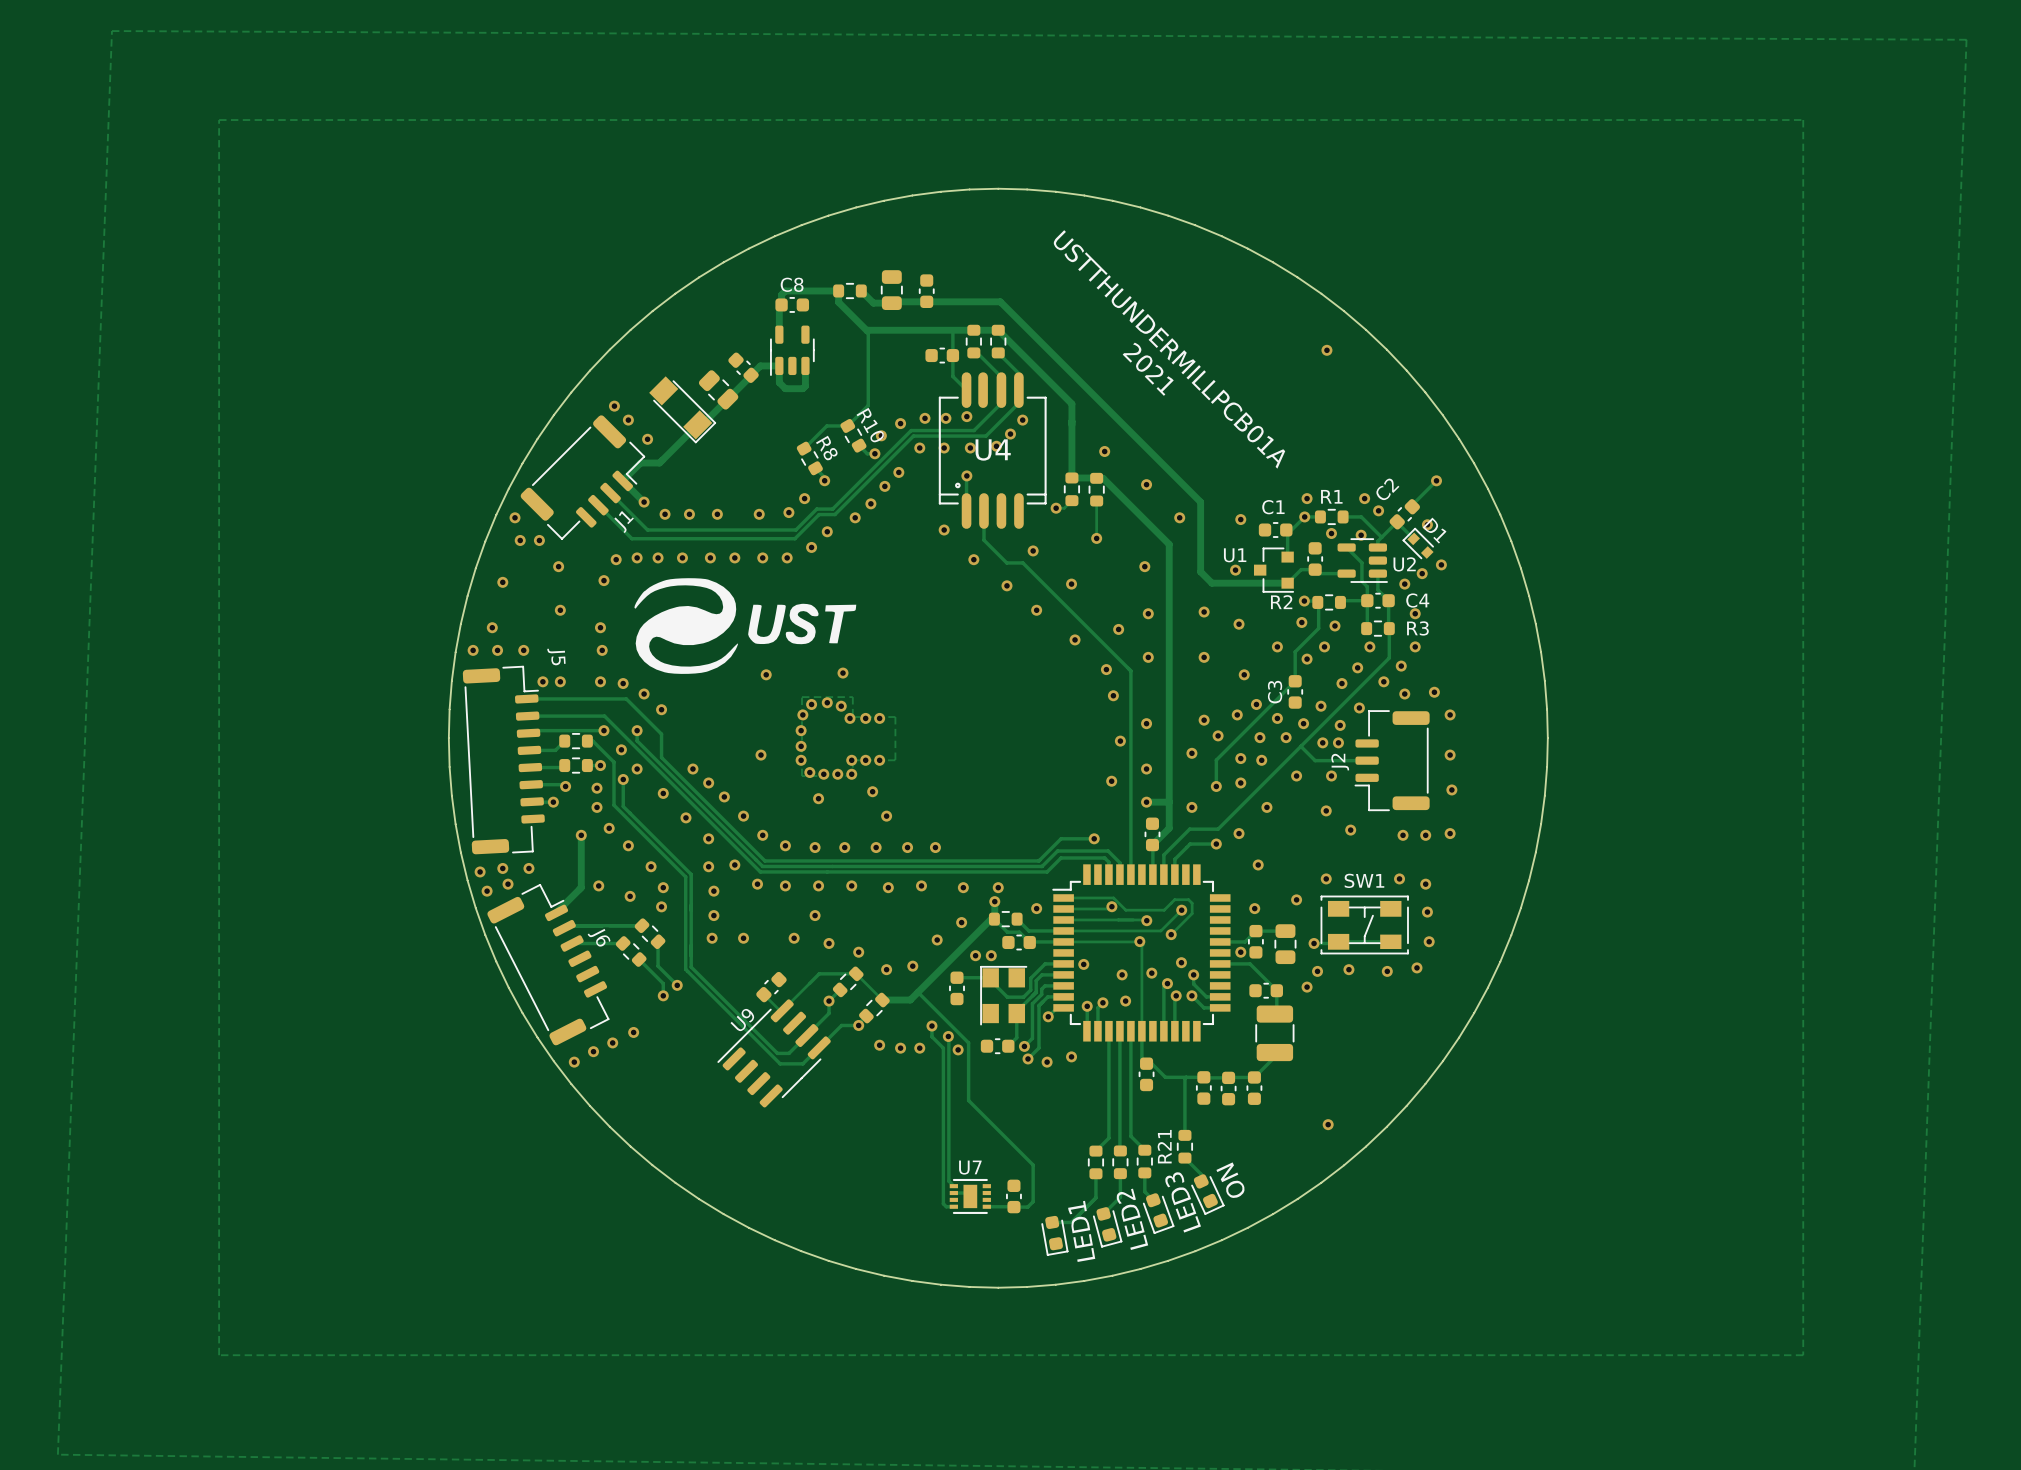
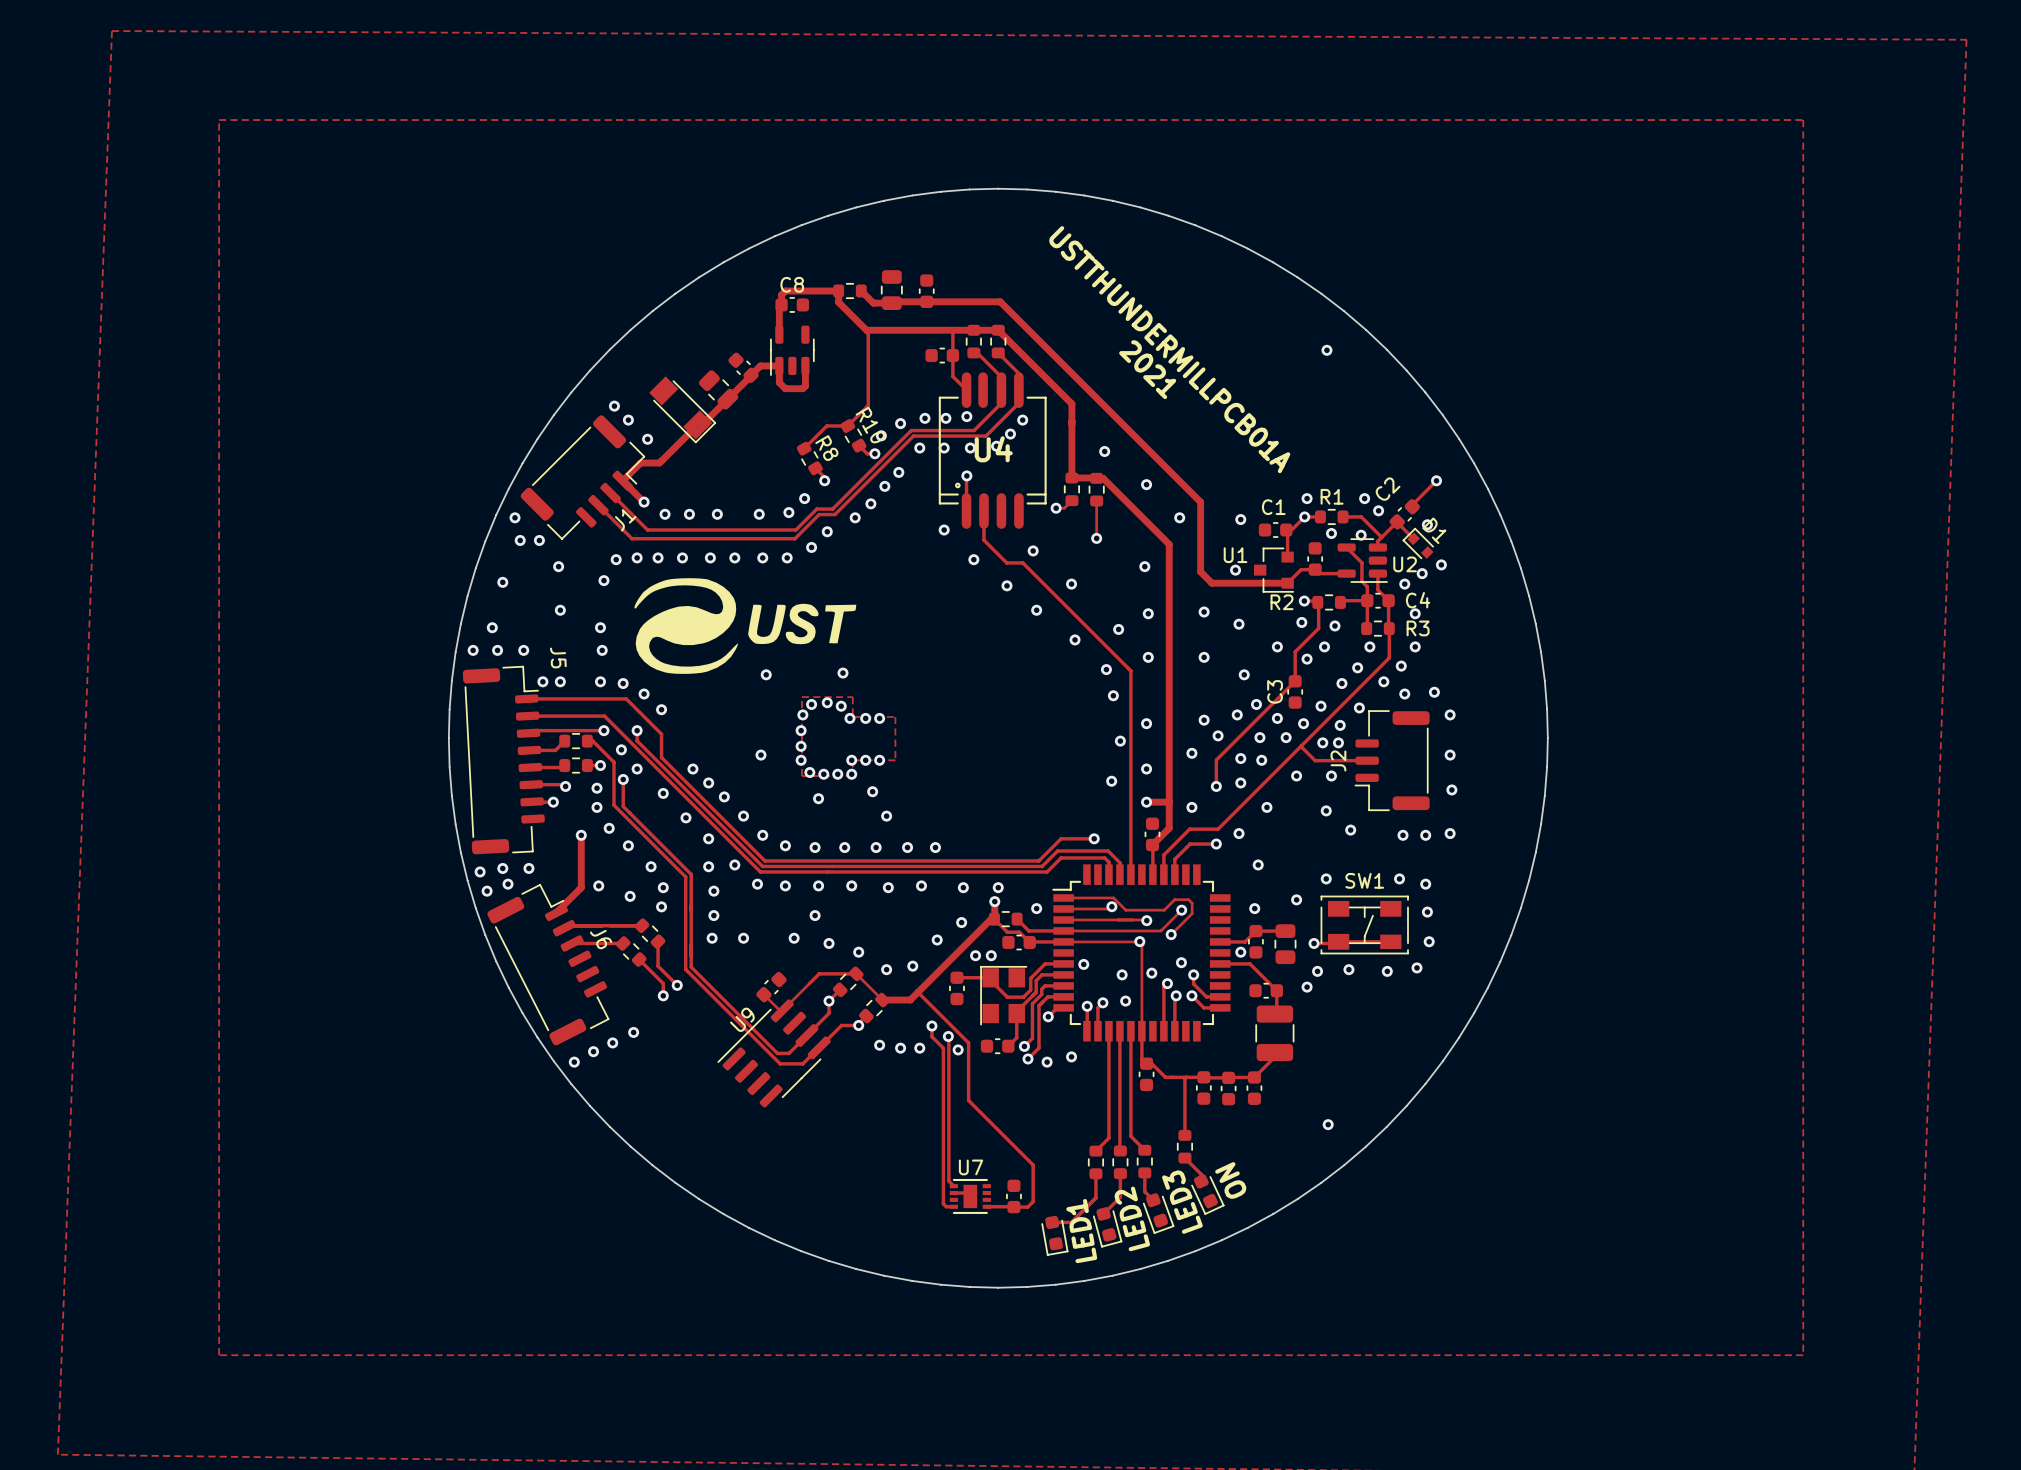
R21 name: R21 (1164, 1146) -> none

